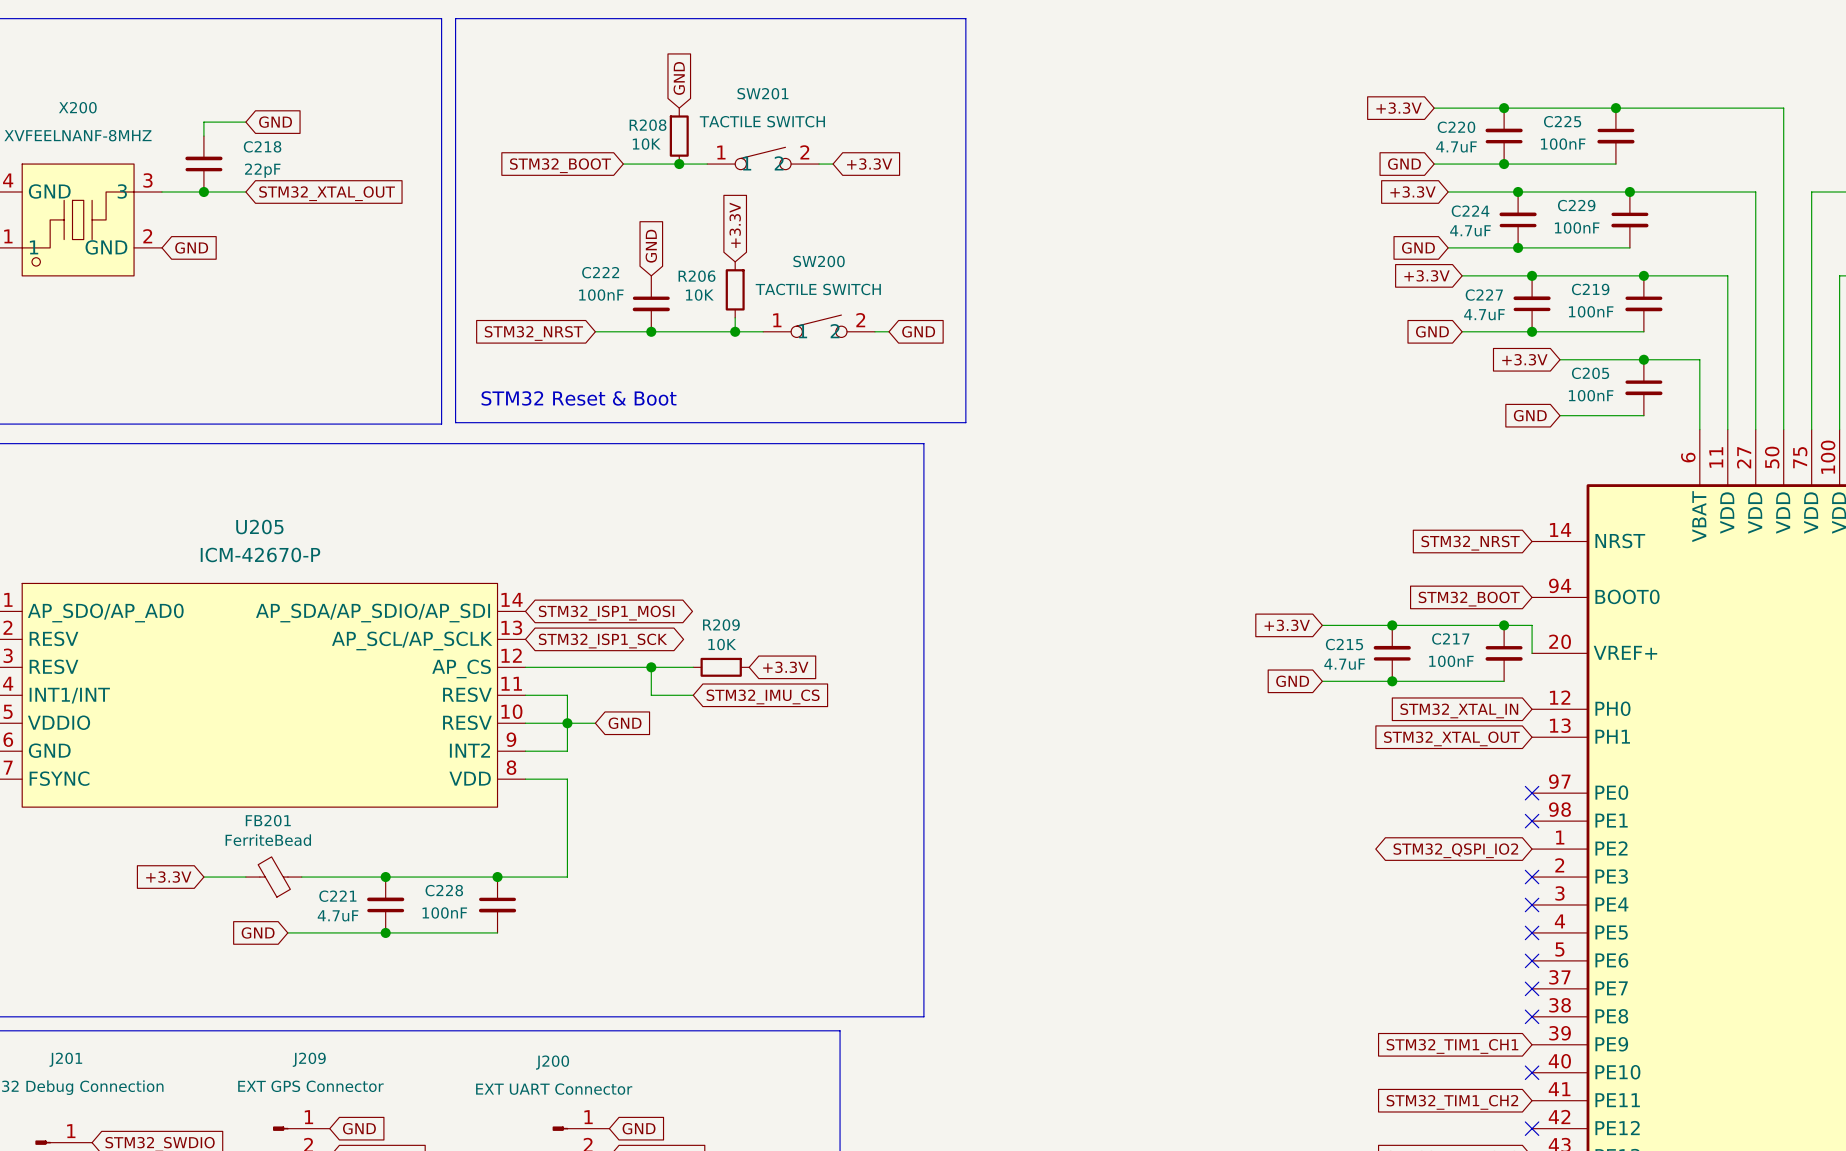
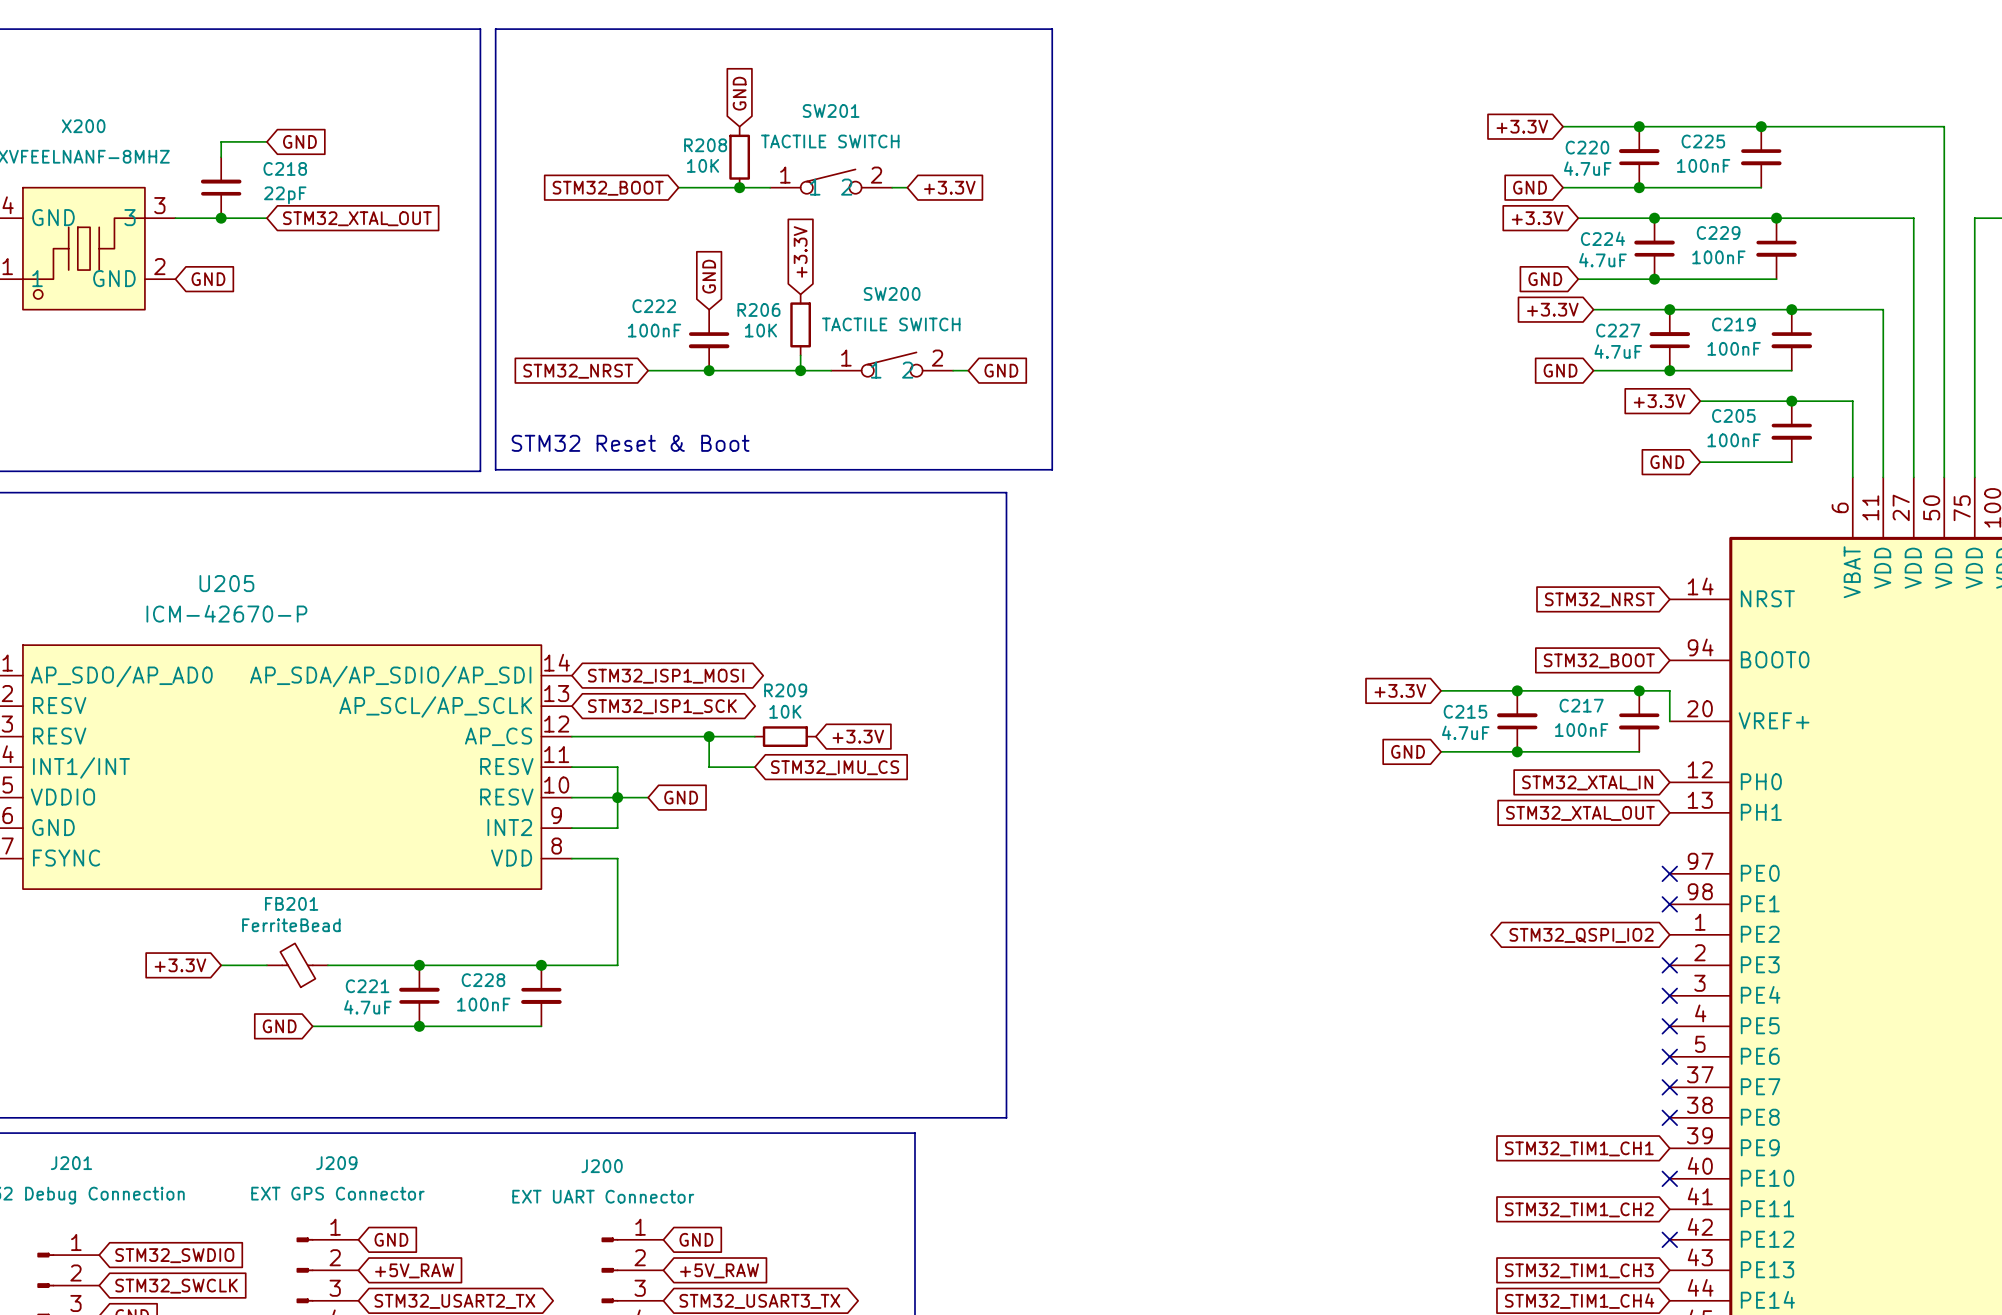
U205 name position: U205 (259, 527) -> U205 (226, 583)
U205 value position: ICM-42670-P (260, 554) -> ICM-42670-P (226, 613)

